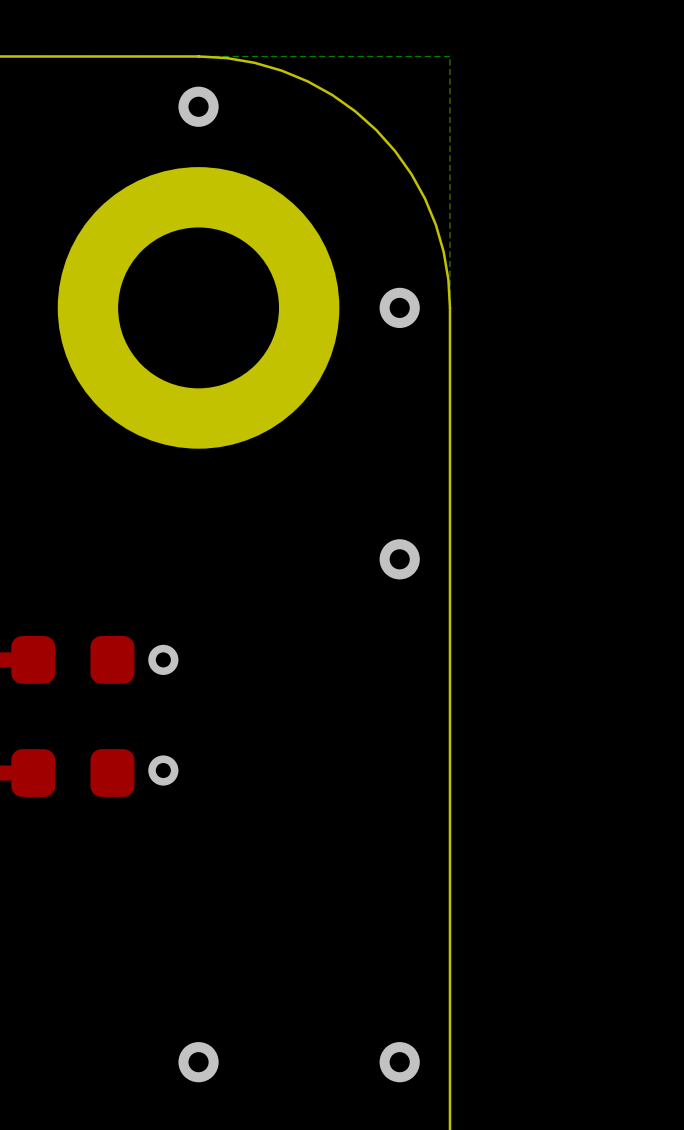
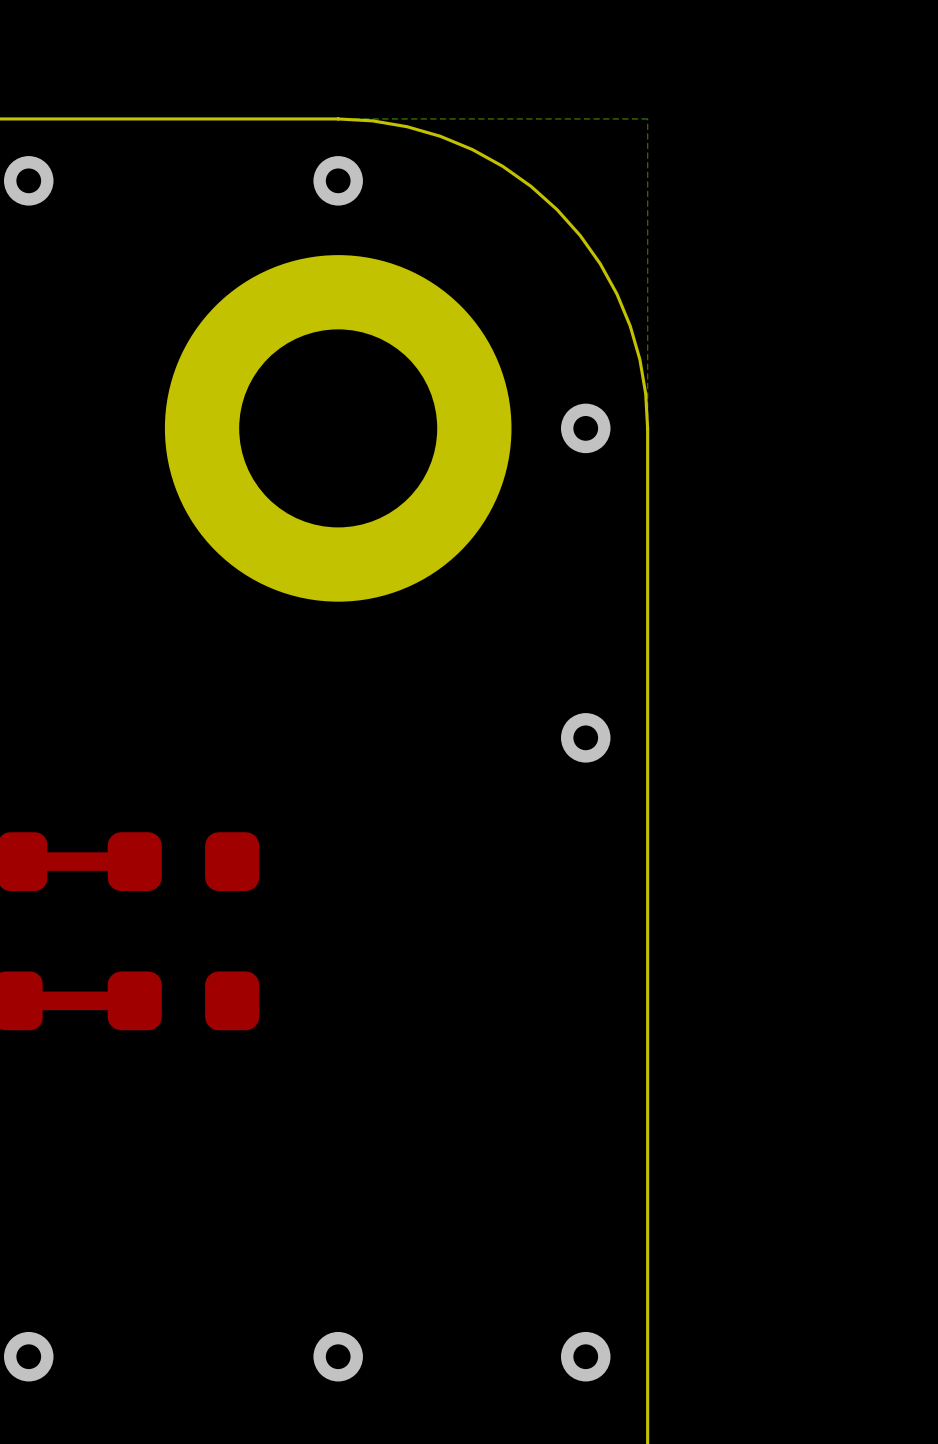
via: (163, 659) -> none
via: (163, 770) -> none

